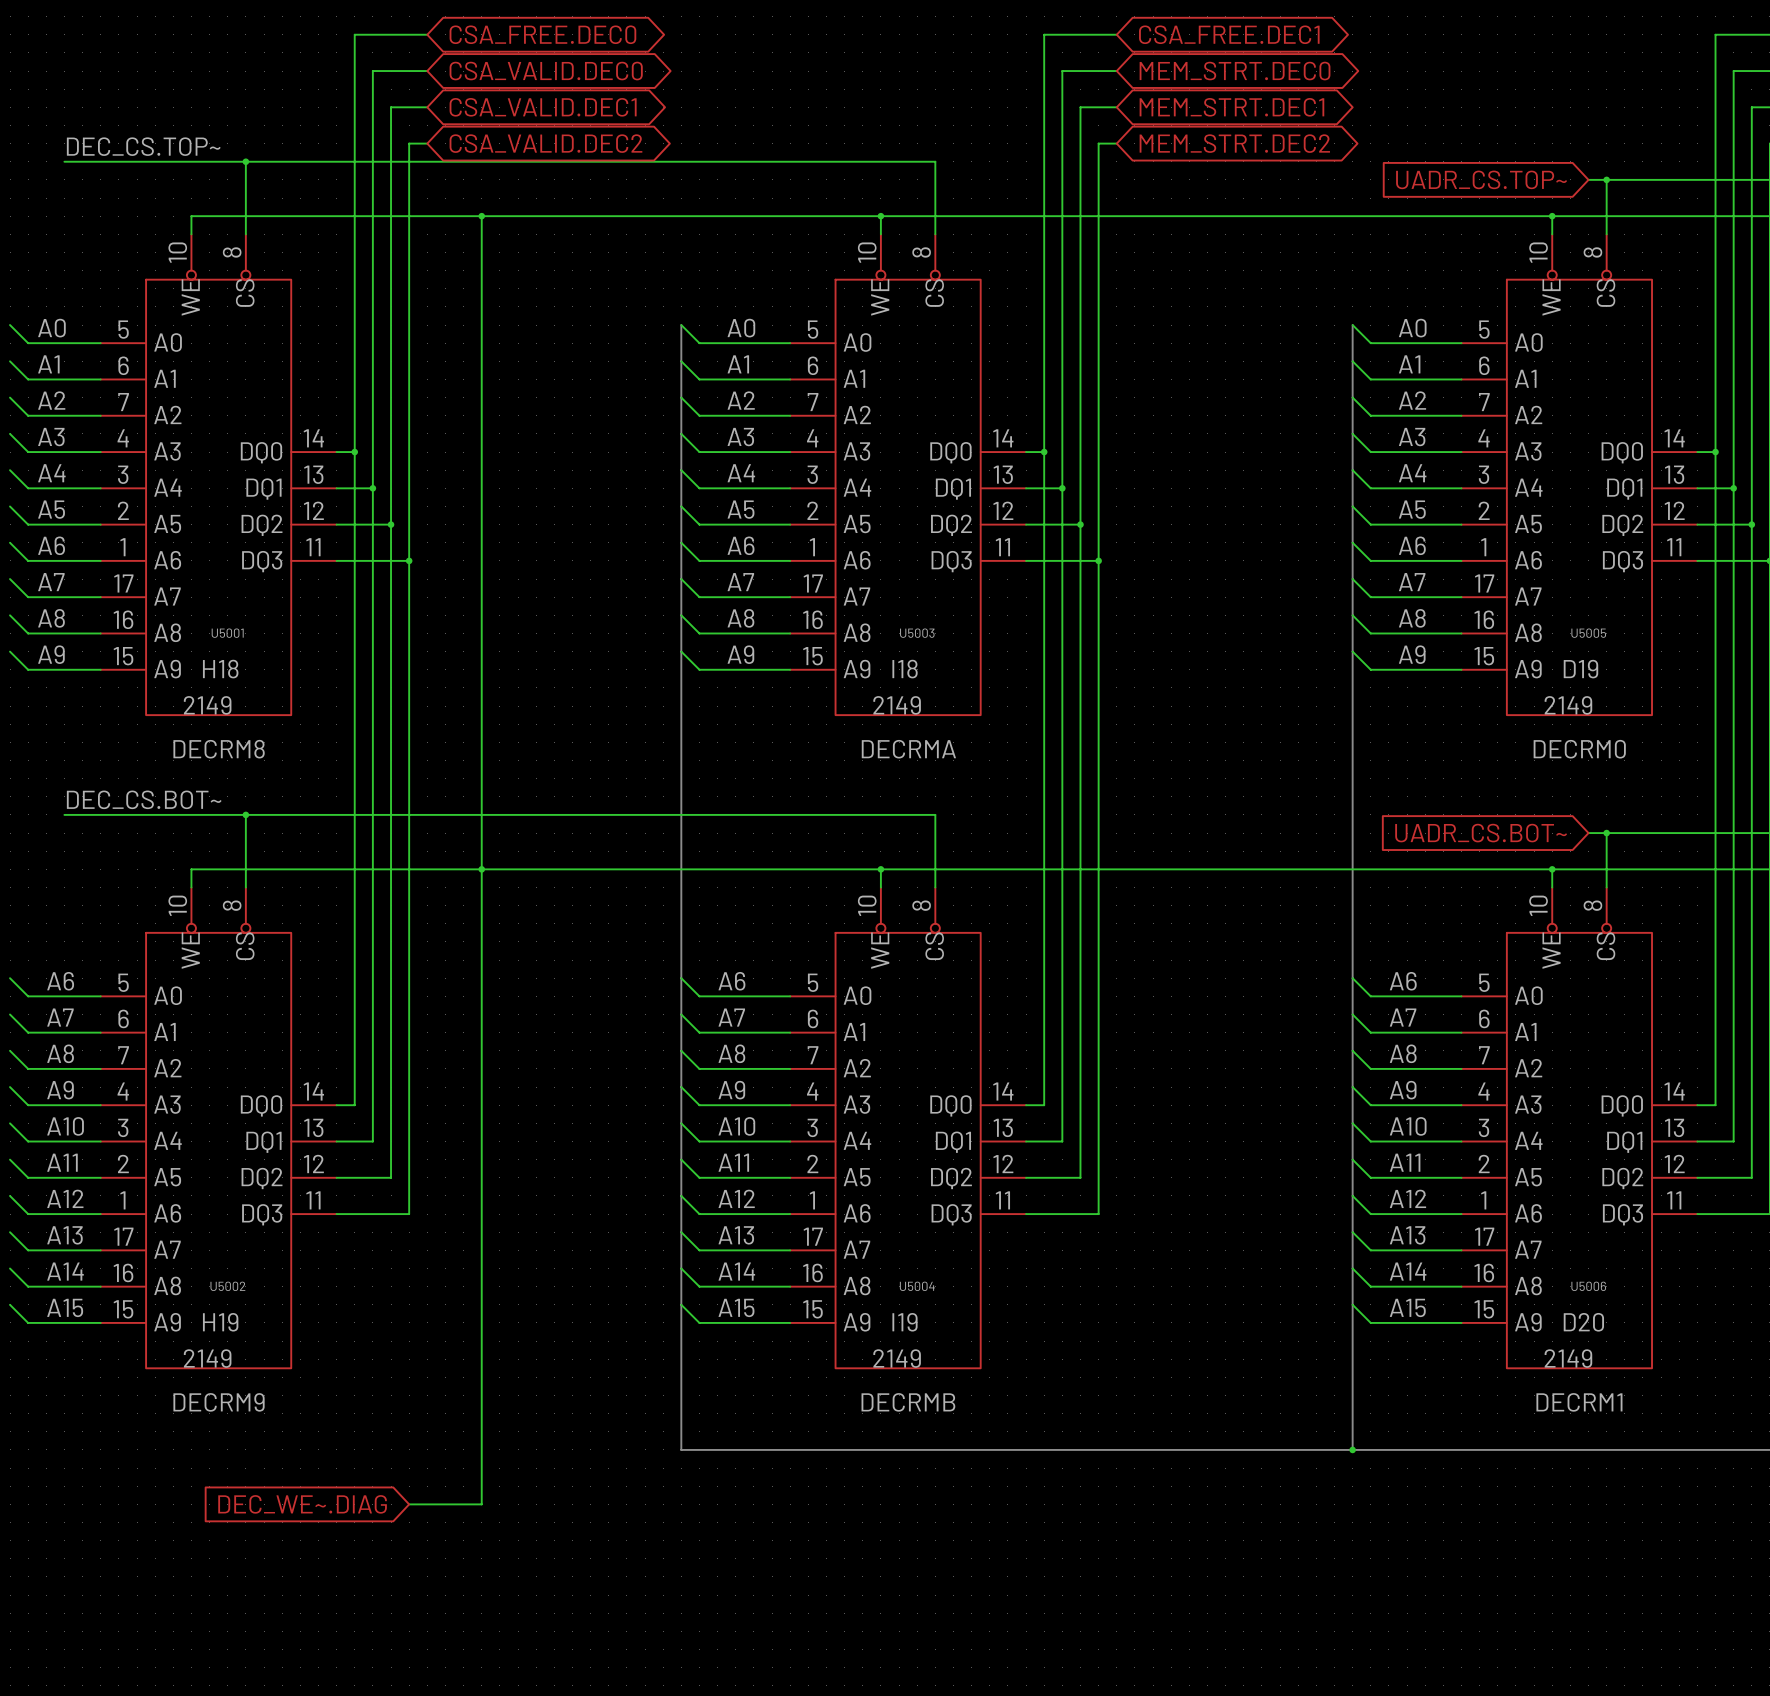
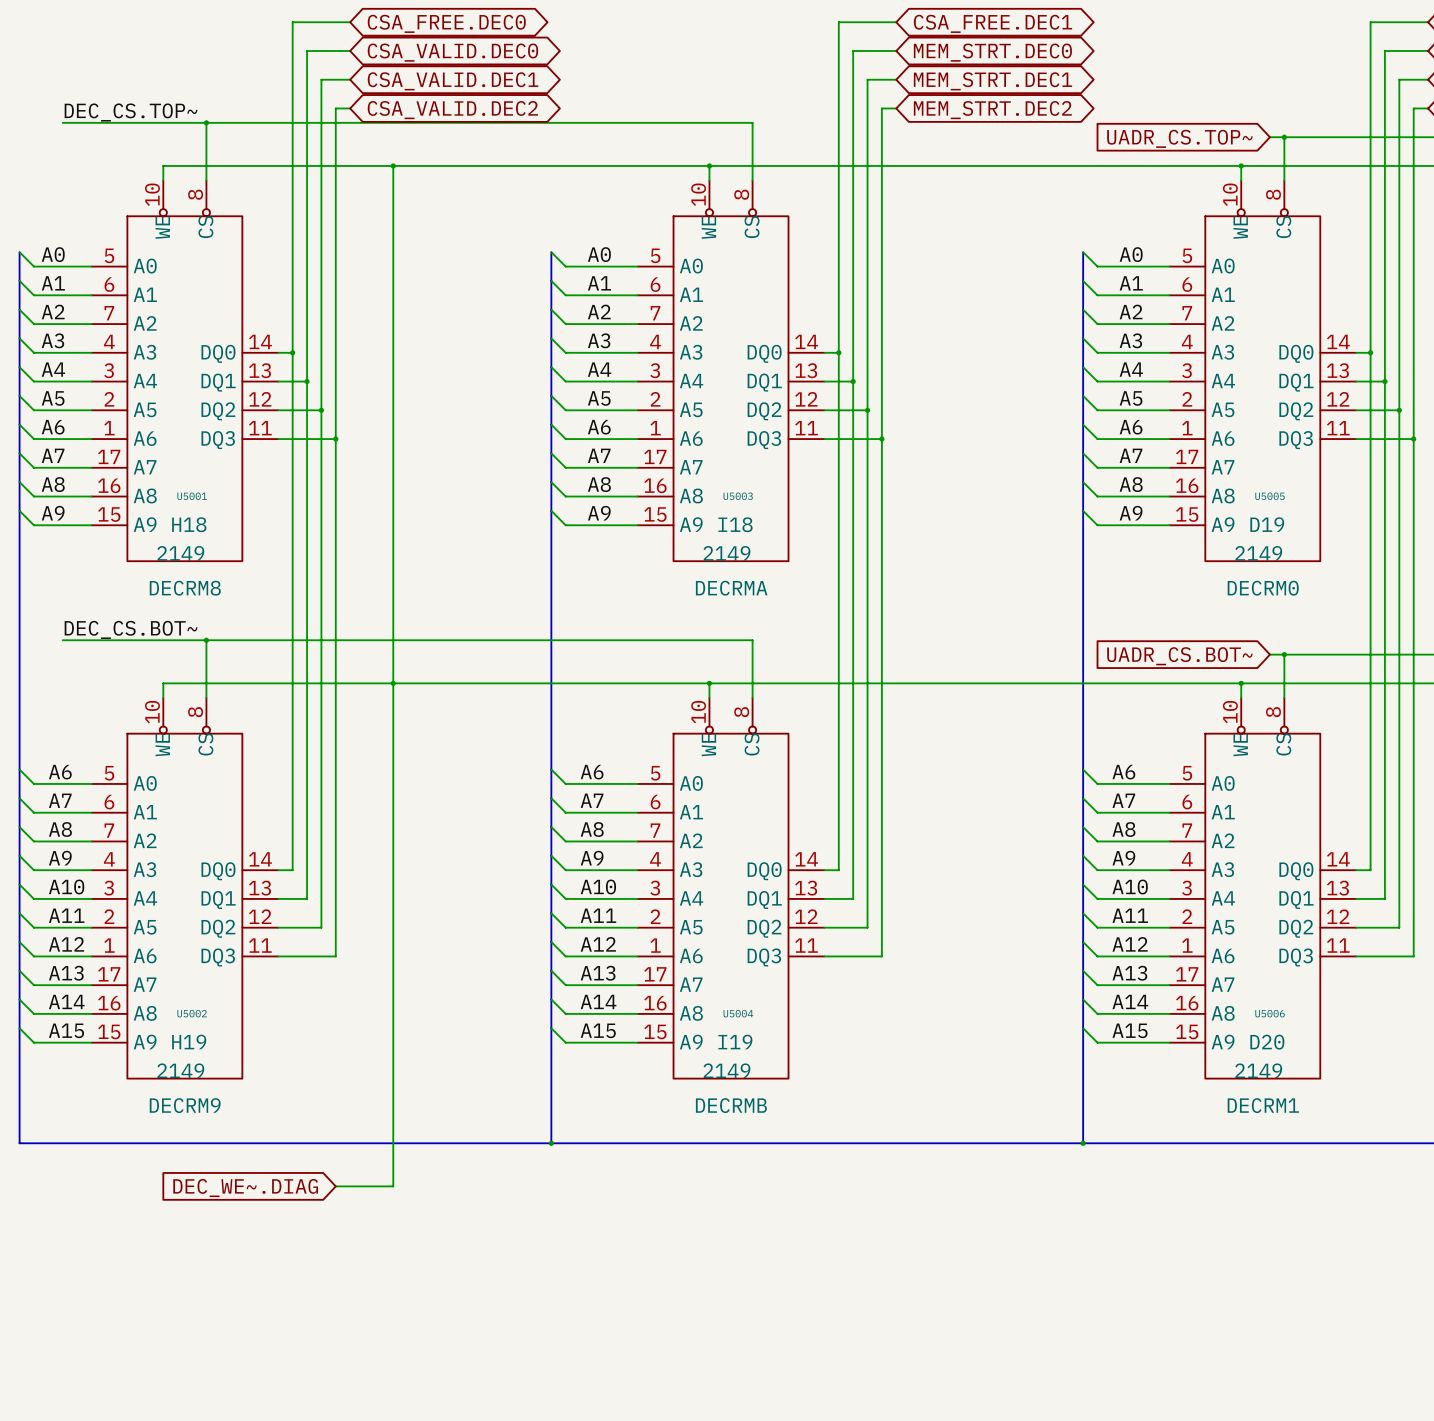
bus: none -> (19, 252) (19, 1143) (551, 1143)
junction: none -> (551, 1143)

